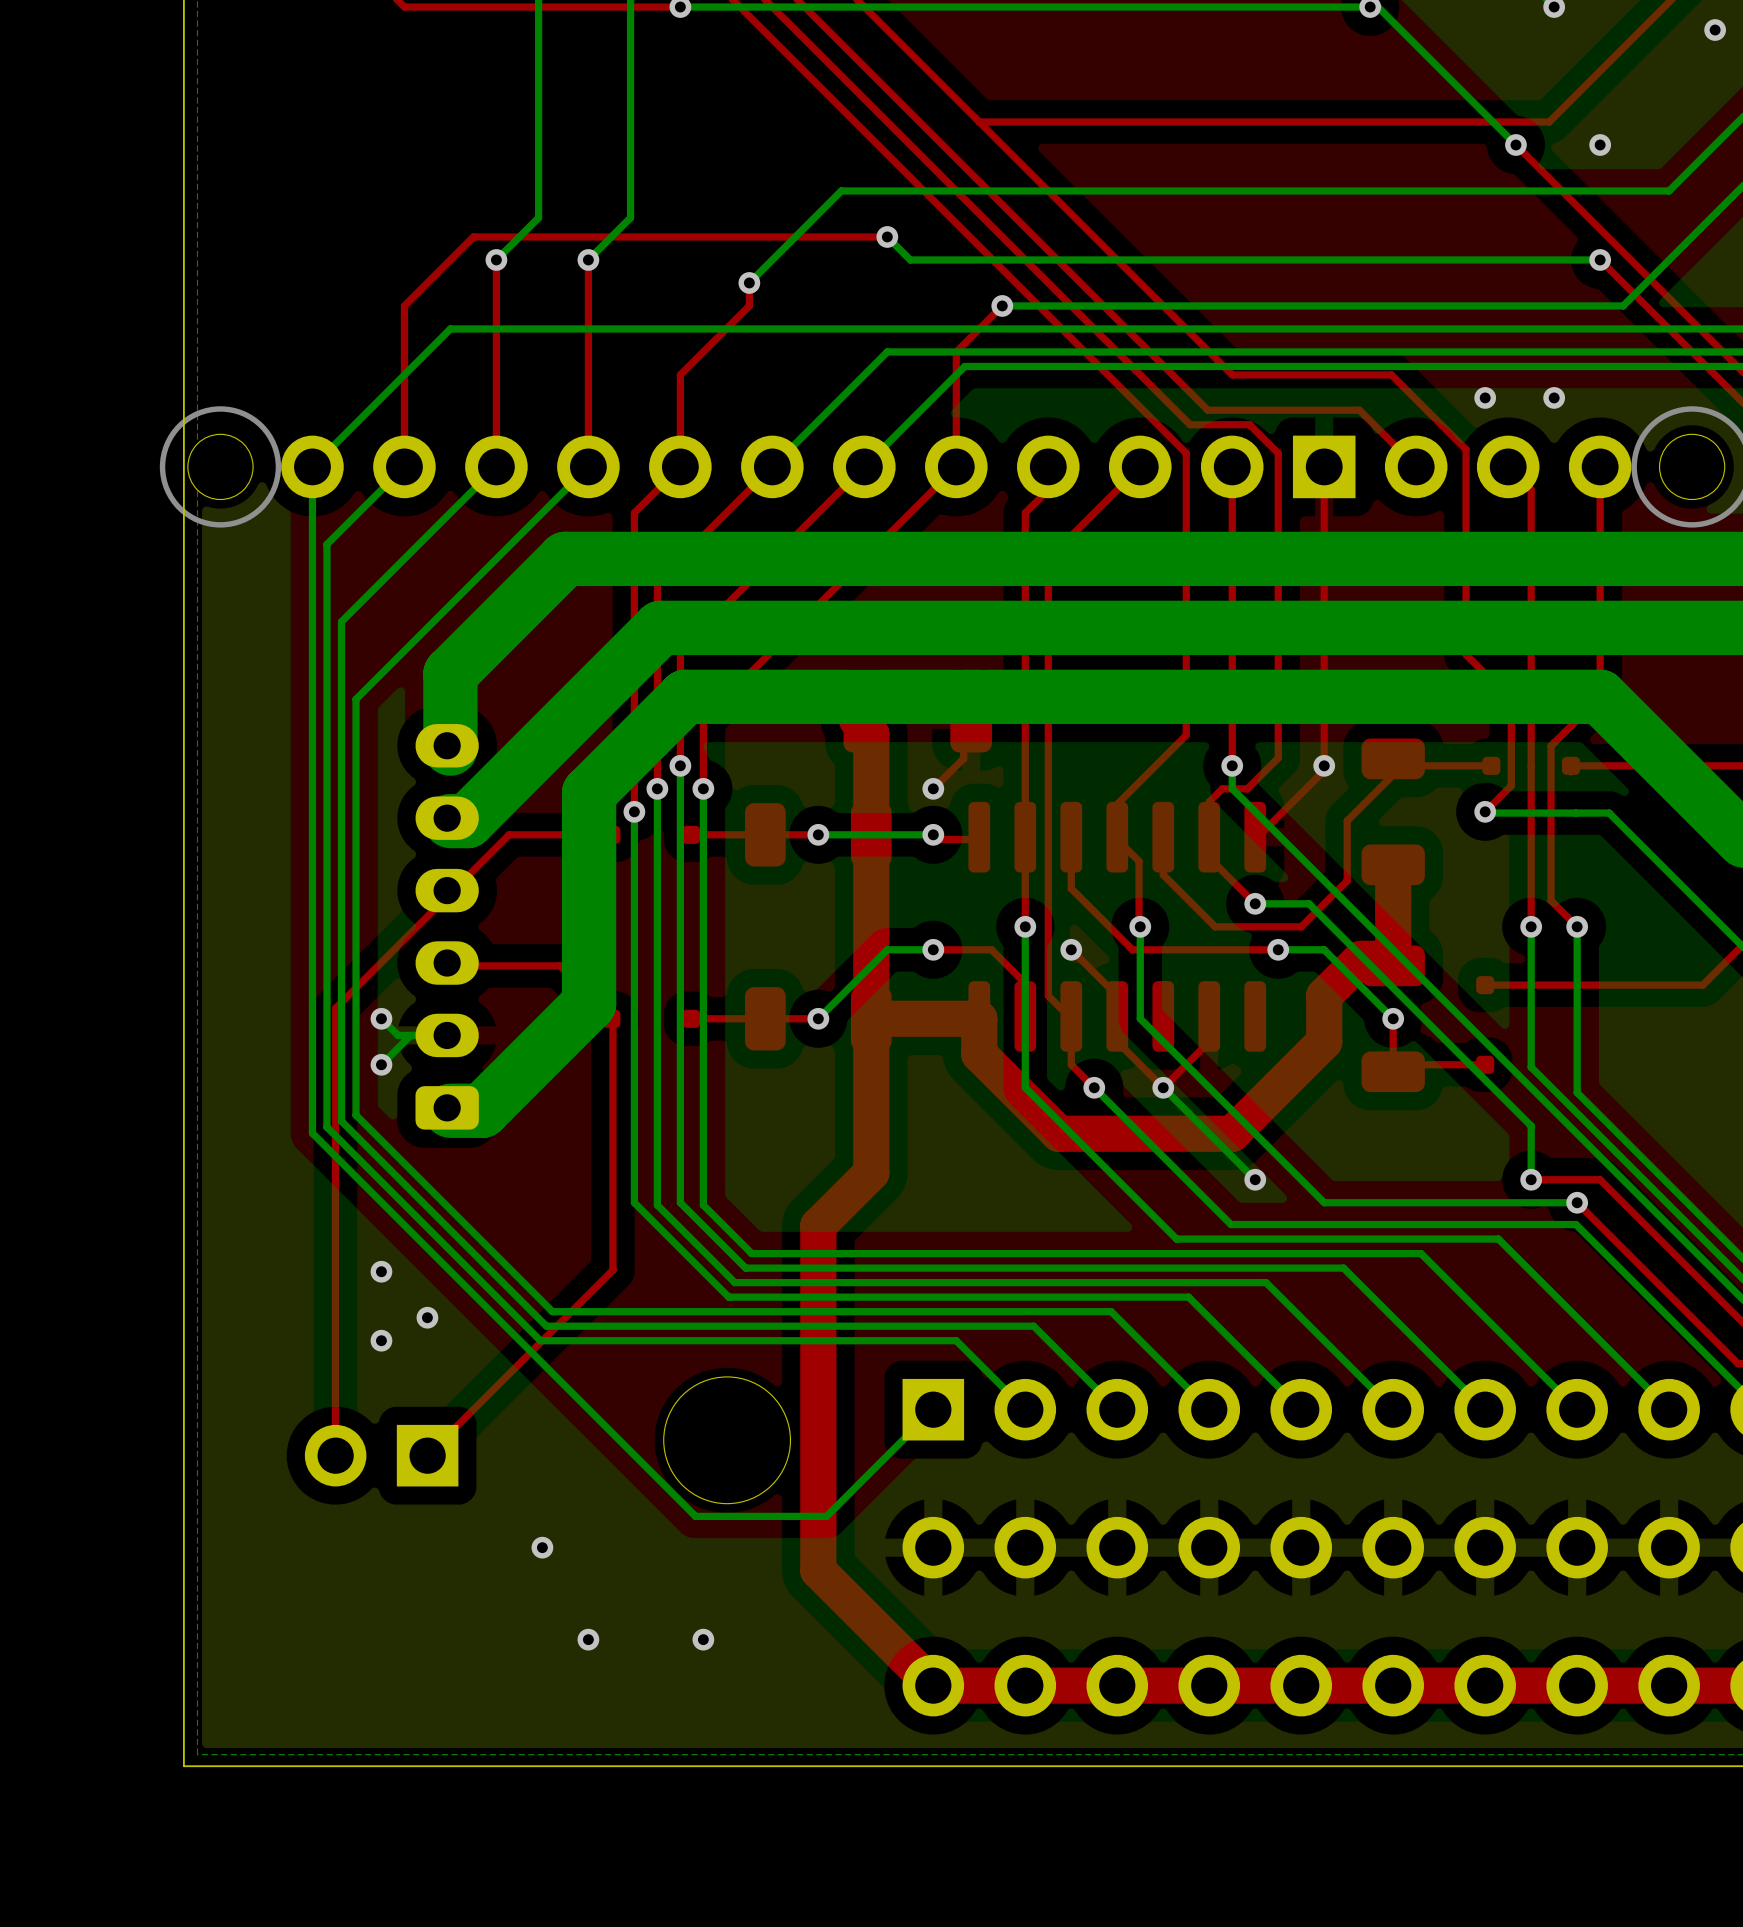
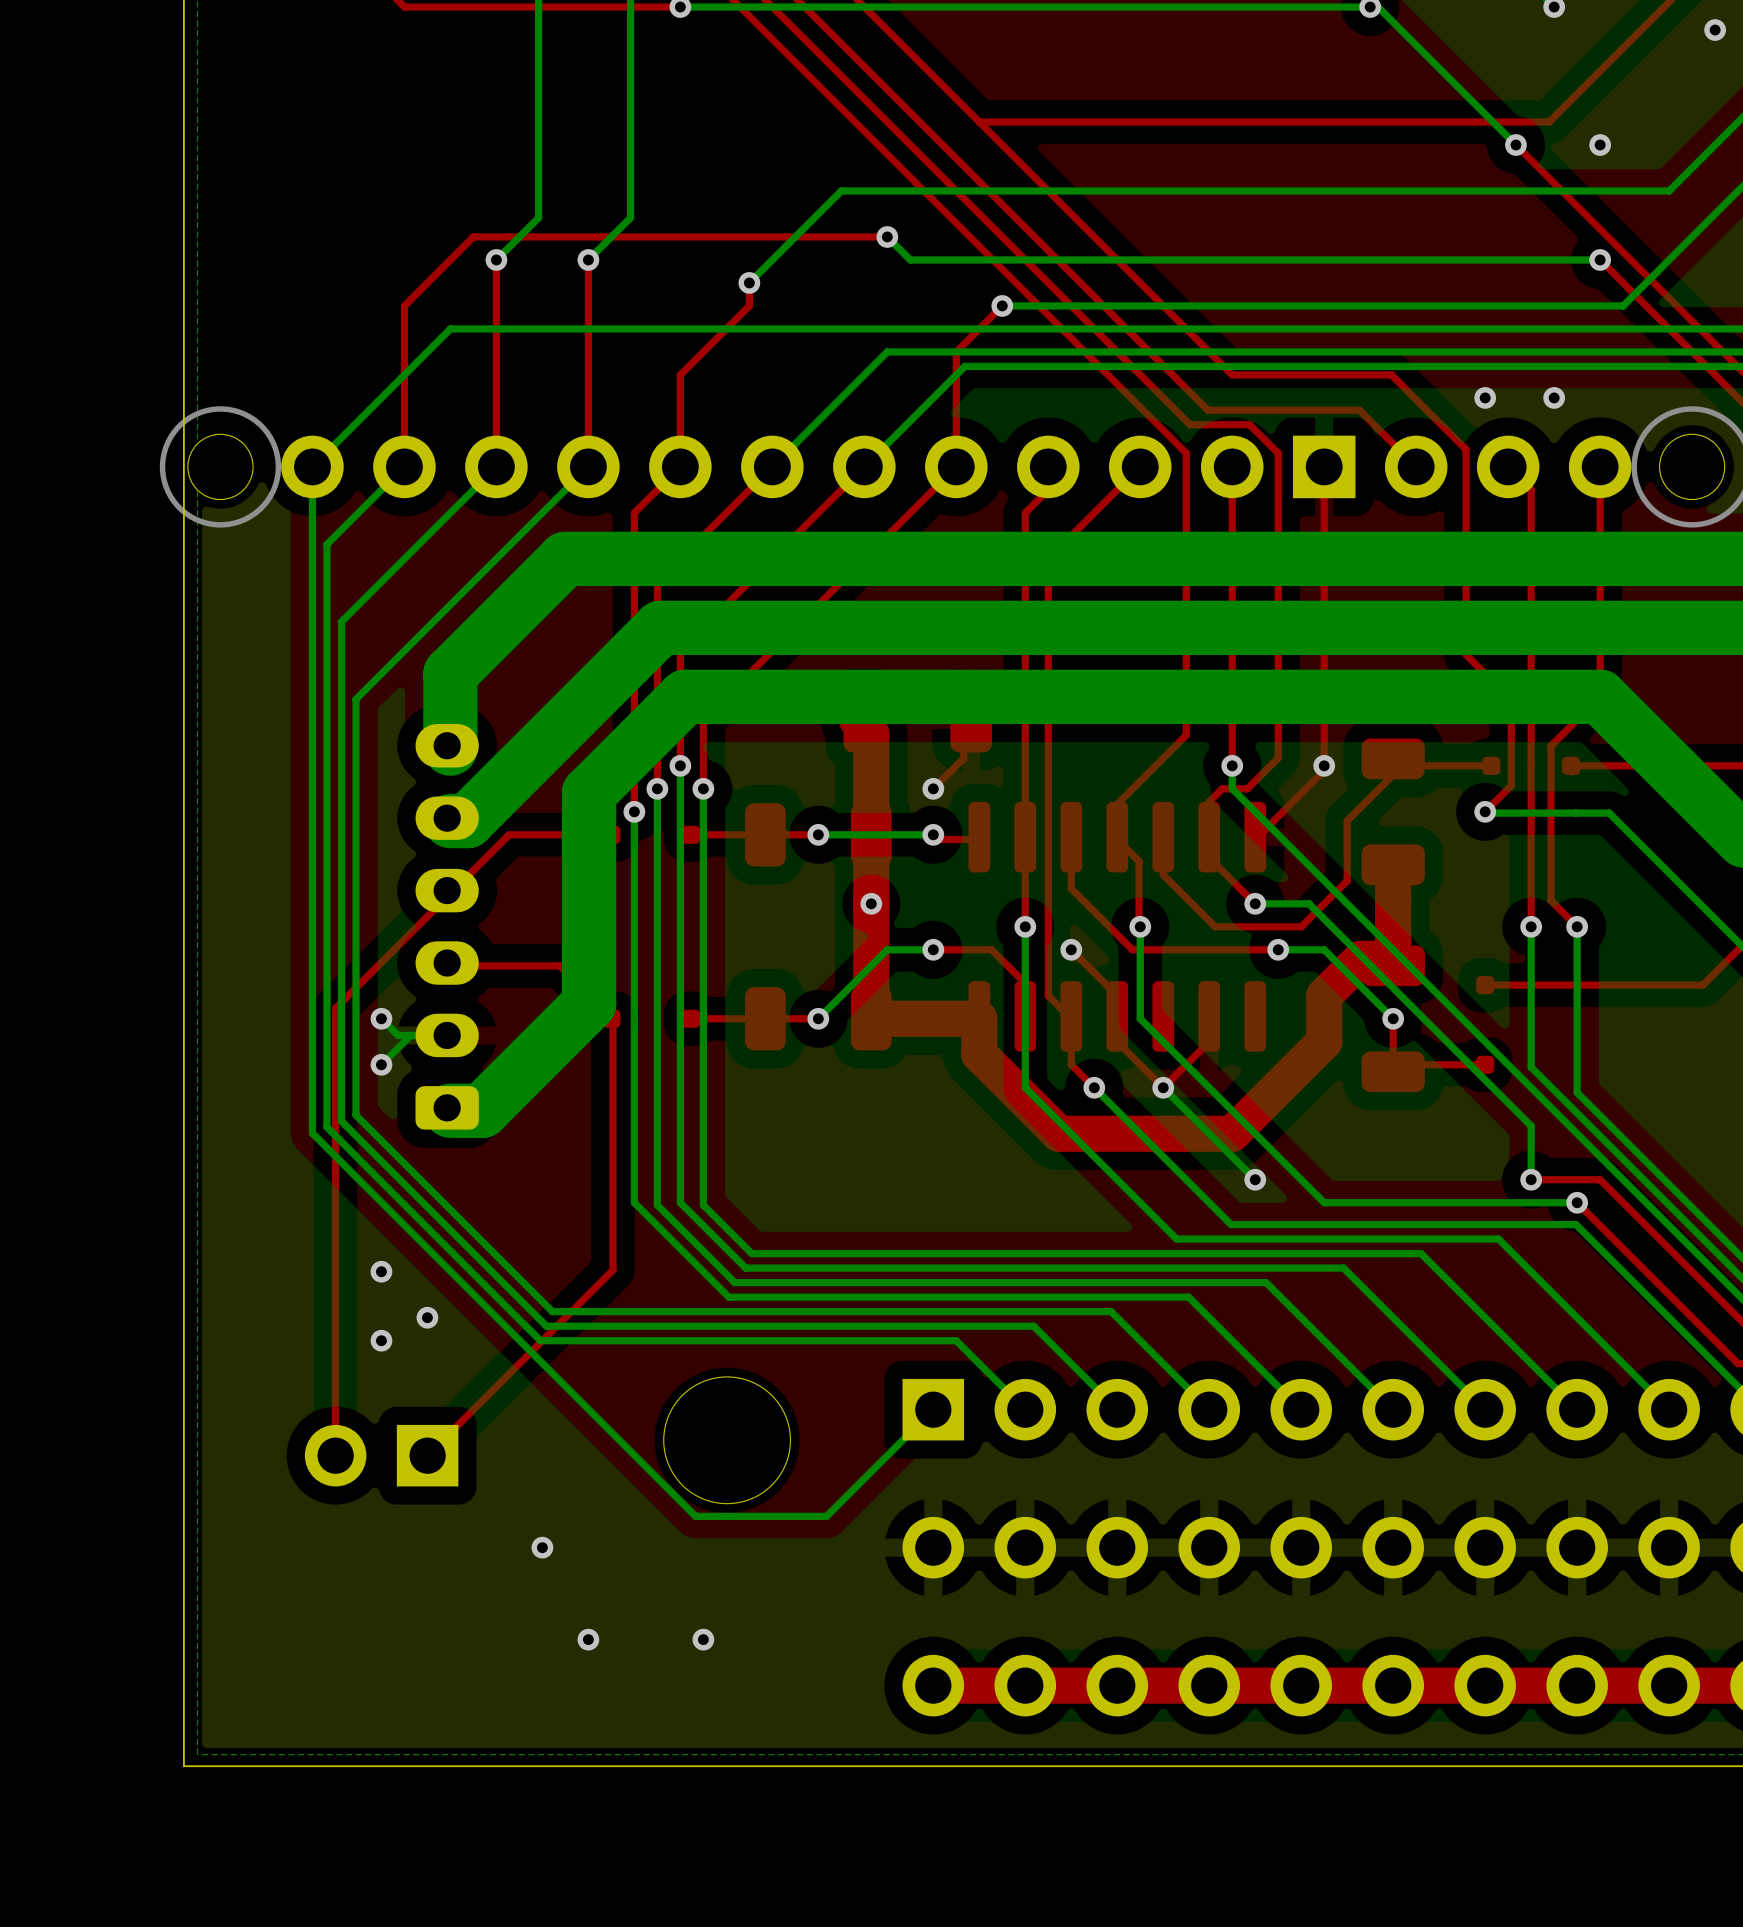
via: none -> (871, 903)
top track: (871, 1018) (871, 1172) (818, 1225) (818, 1570) (933, 1685) -> none

